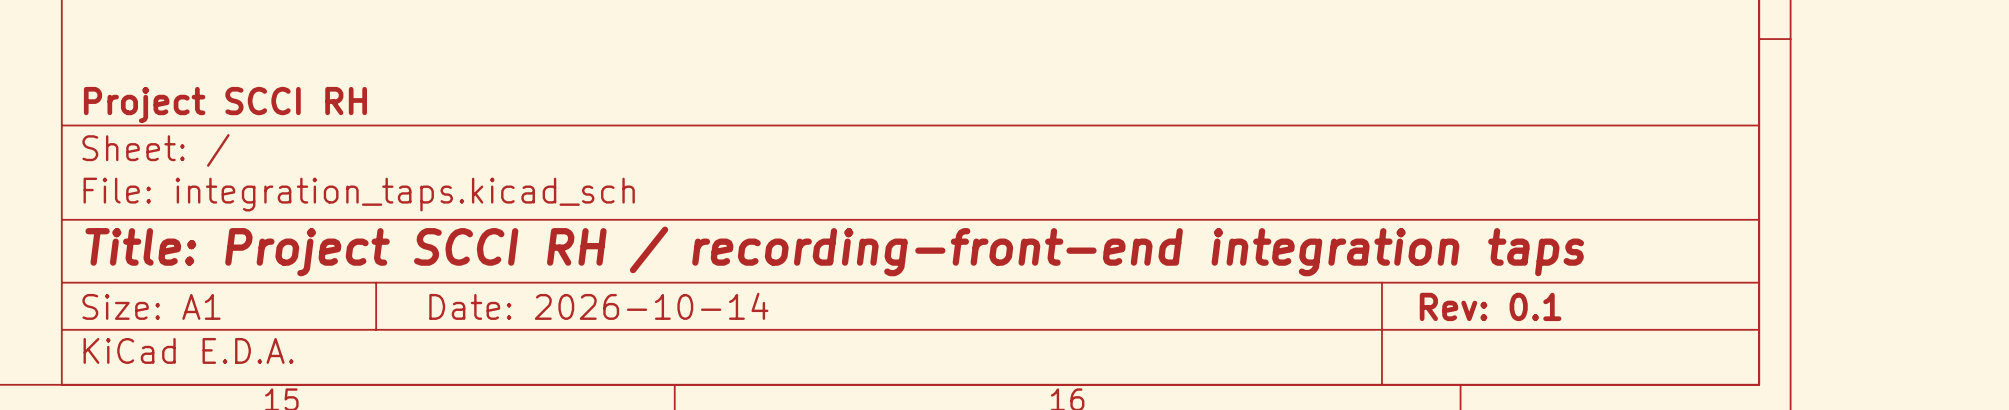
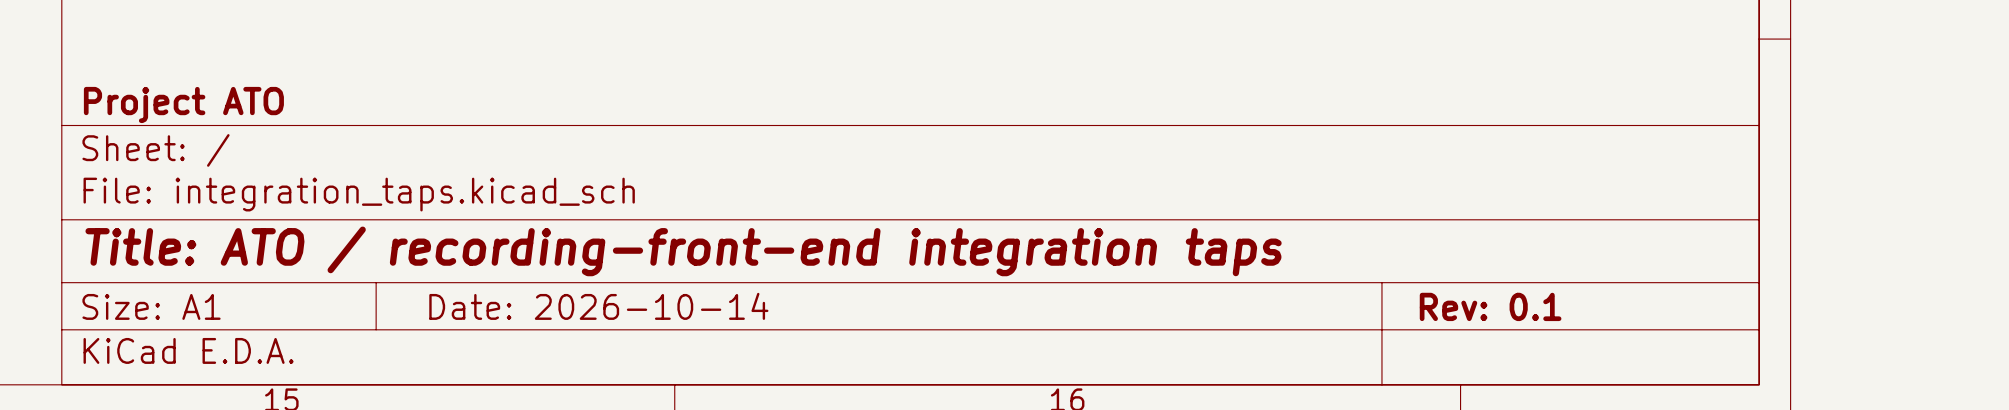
title block: Project SCCI RH (225, 104) -> Project ATO (183, 104)
title block: Title: Project SCCI RH / recording-front-end integration taps (834, 251) -> Title: ATO / recording-front-end integration taps (683, 251)

